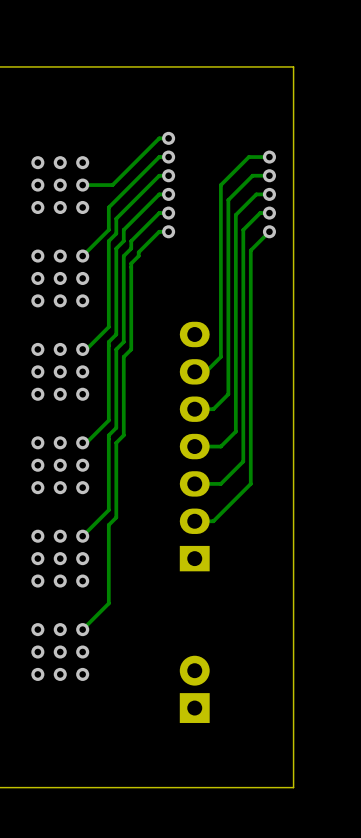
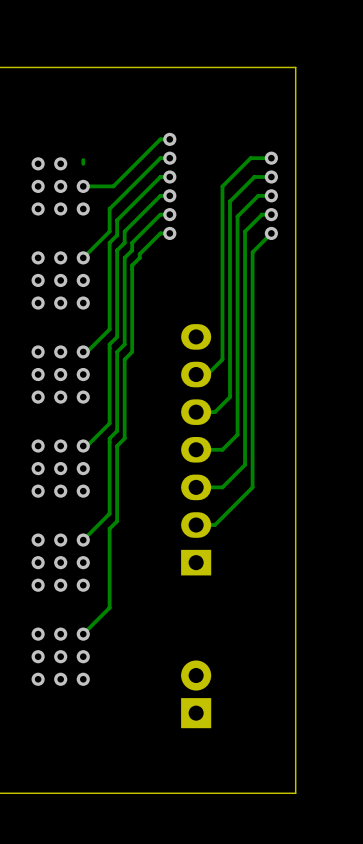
via: (82, 162) -> none

